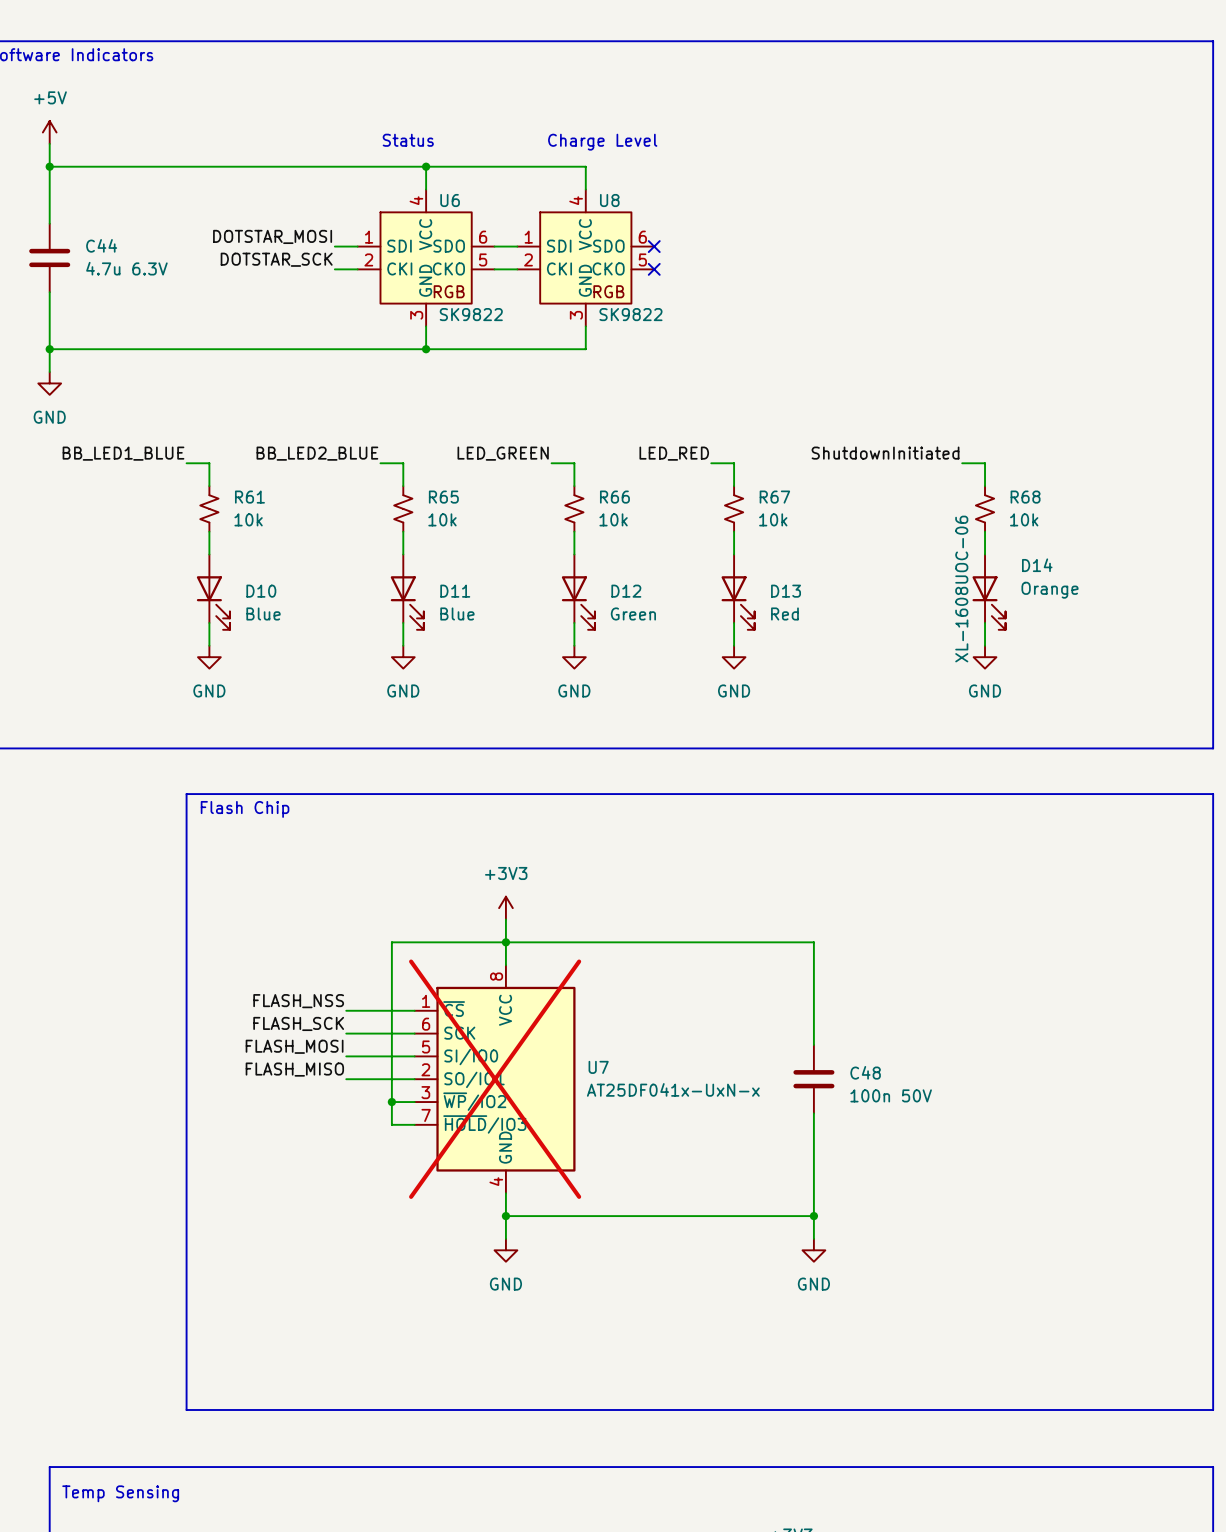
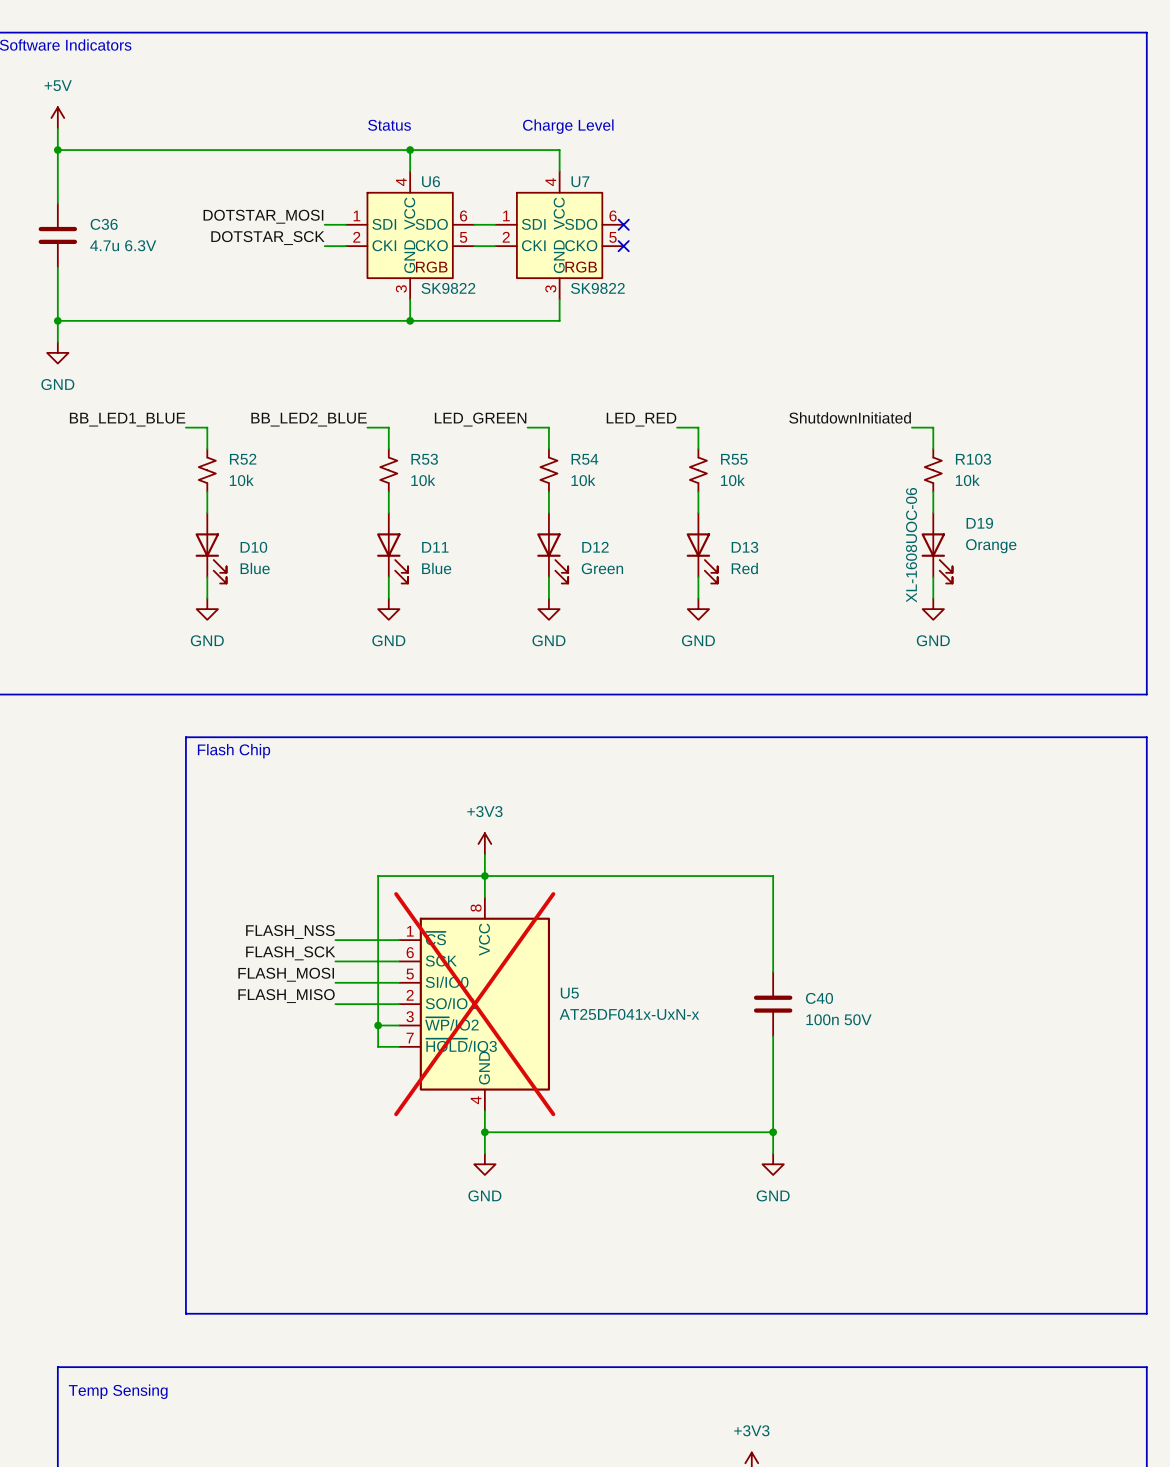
U8 name: U8 (609, 200) -> U7 (580, 181)
C44 name: C44 (101, 245) -> C36 (104, 224)
R61 name: R61 (249, 497) -> R52 (243, 459)
R65 name: R65 (443, 497) -> R53 (424, 459)
R66 name: R66 (614, 497) -> R54 (584, 459)
R67 name: R67 (774, 497) -> R55 (734, 459)
R68 name: R68 (1025, 497) -> R103 (973, 459)
D14 name: D14 (1037, 565) -> D19 (979, 523)
U7 name: U7 (598, 1067) -> U5 (569, 993)
C48 name: C48 (865, 1072) -> C40 (819, 998)

